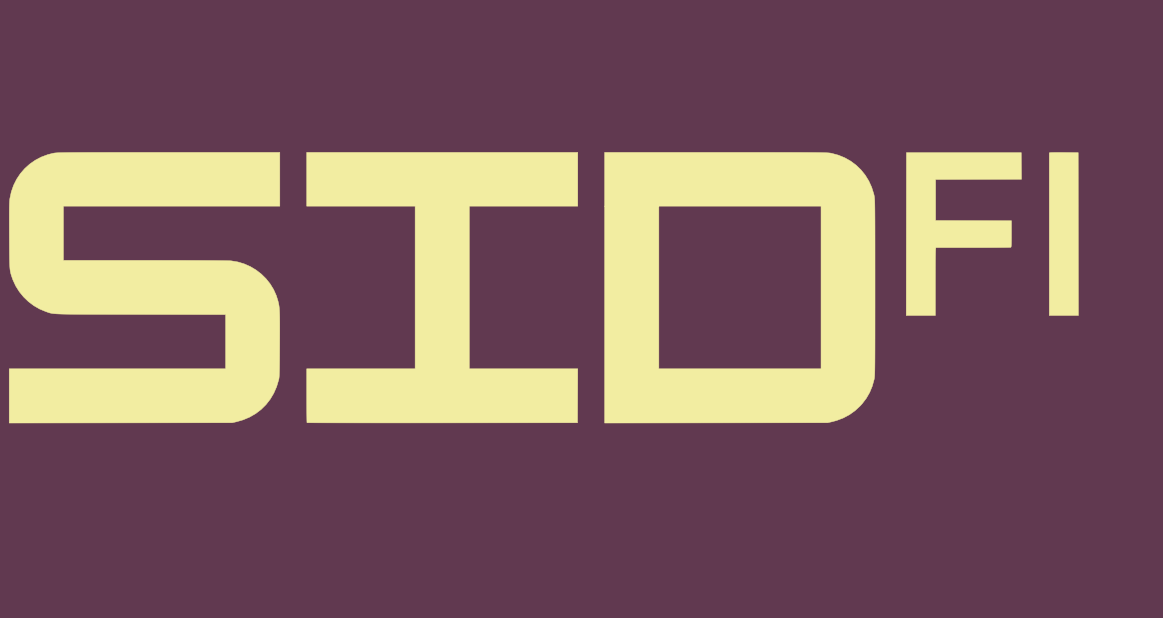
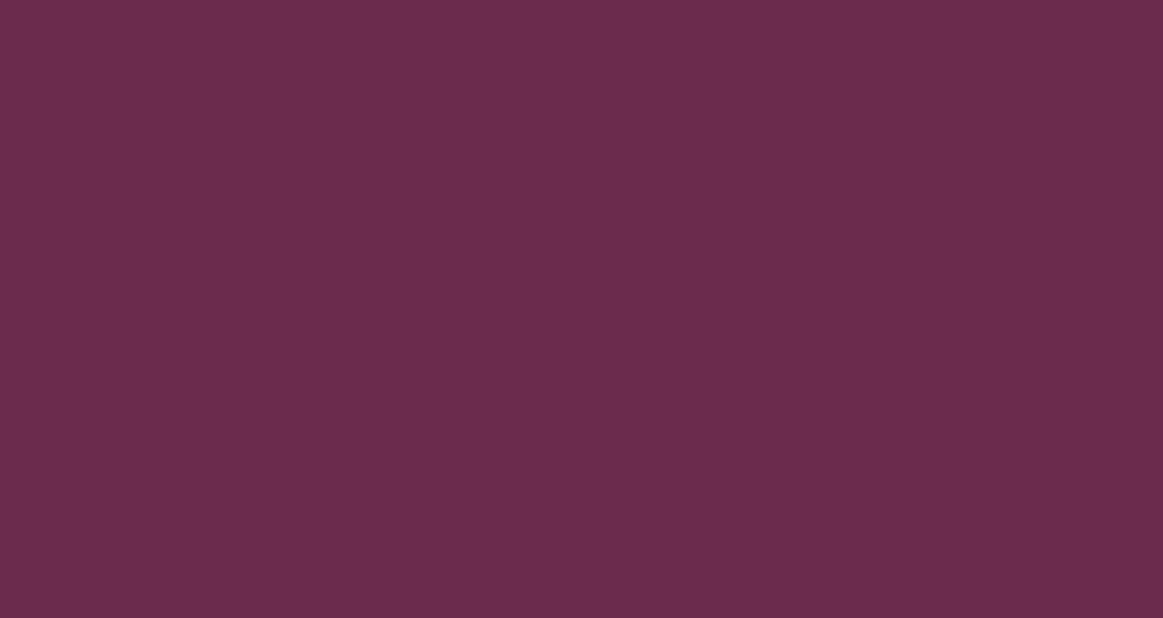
drawing: [8, 152, 1079, 424] -> none

